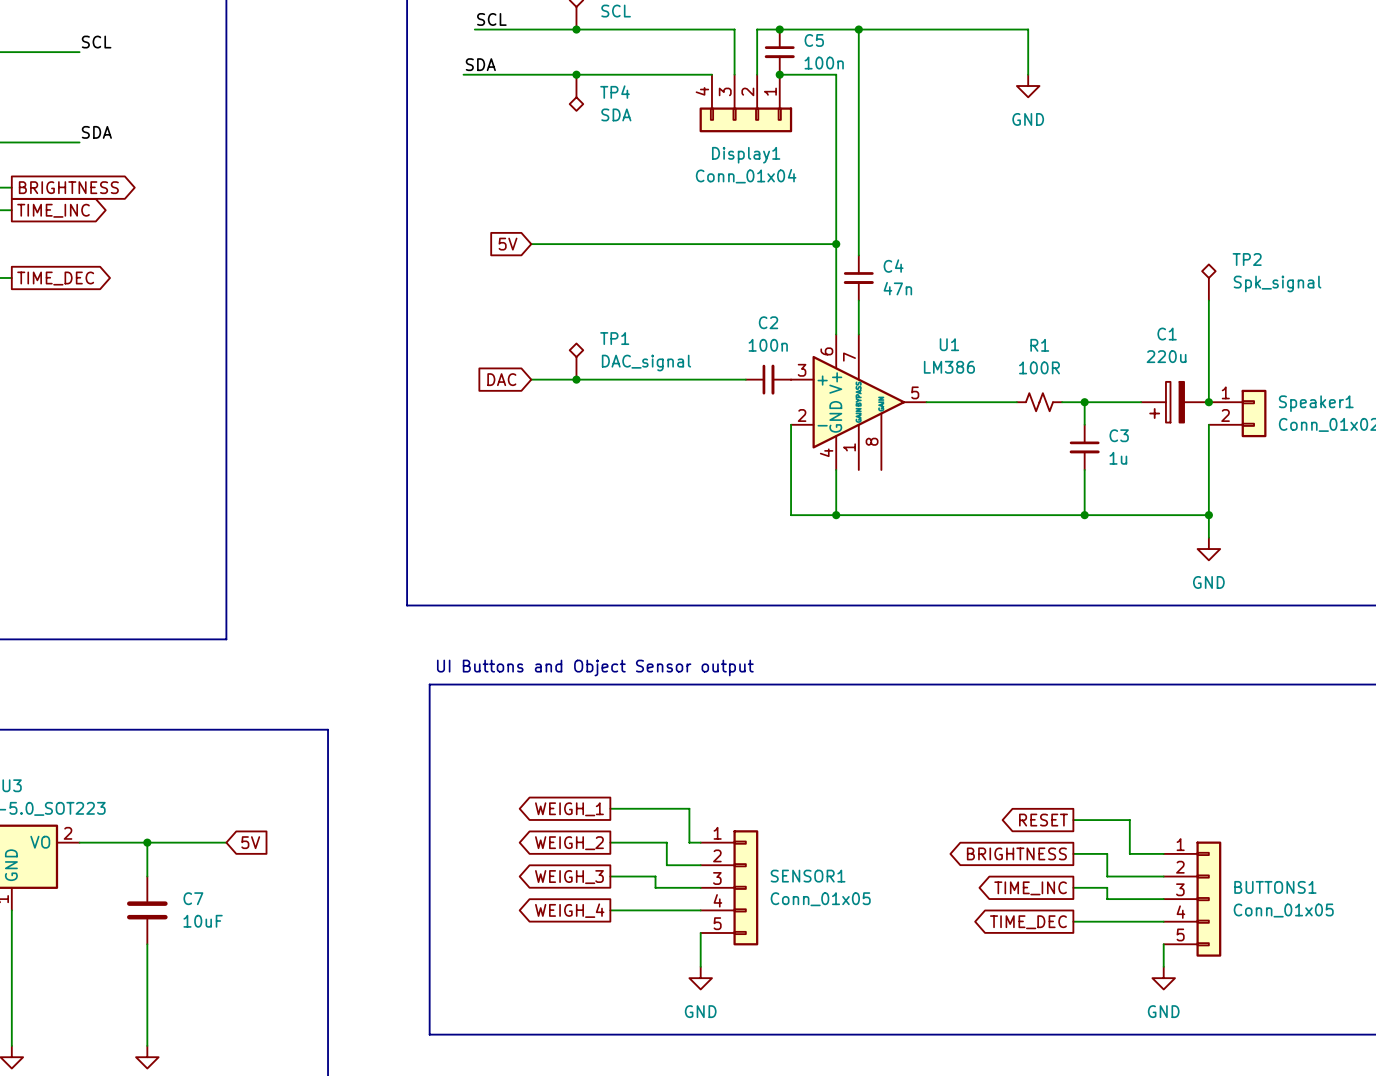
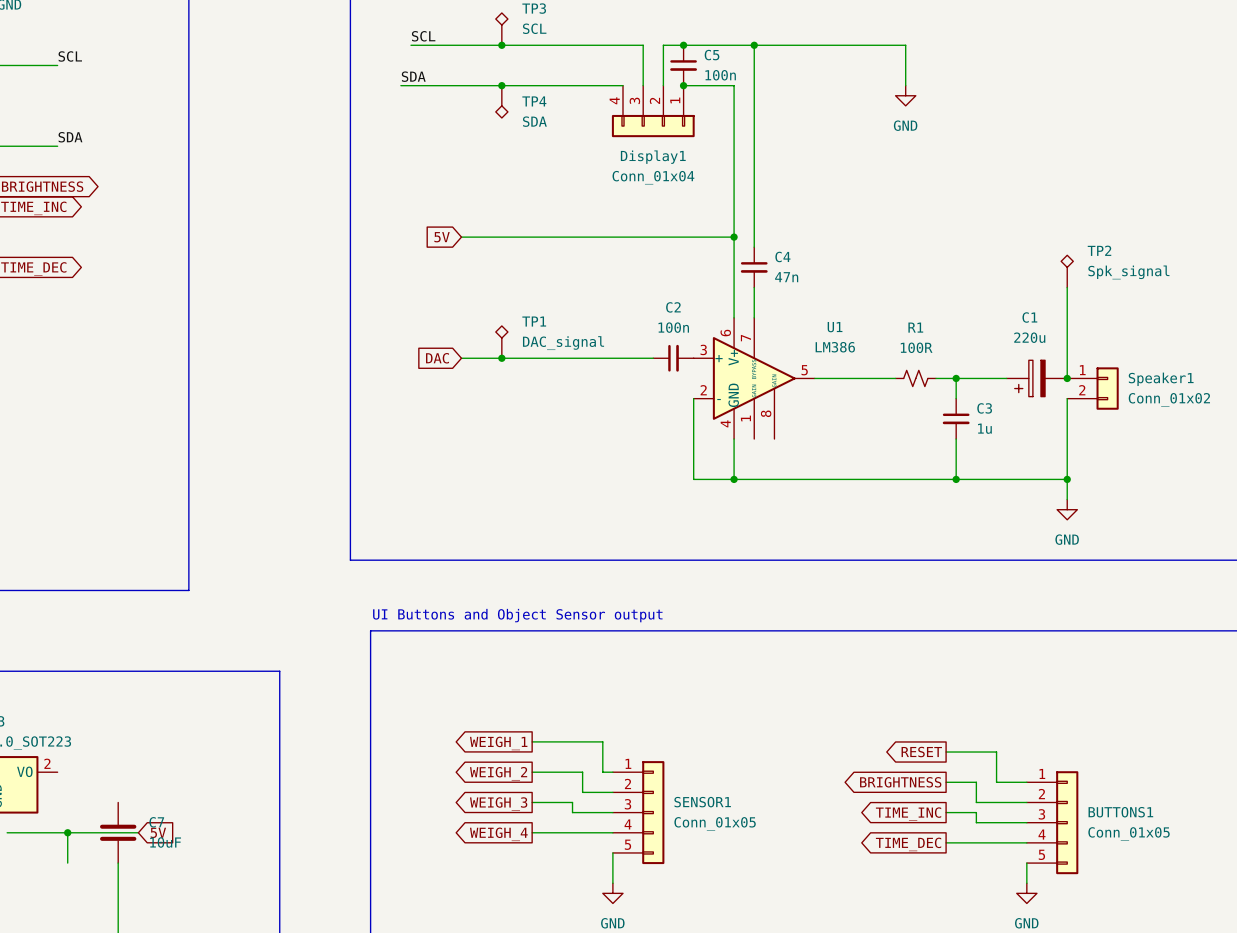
wire: (79, 842) (226, 842) -> (7, 832) (138, 832)
wire: (147, 842) (147, 876) -> (67, 832) (67, 863)
junction: (147, 842) -> none
global label position: 5V (250, 842) -> 5V (158, 832)
junction: none -> (67, 832)

